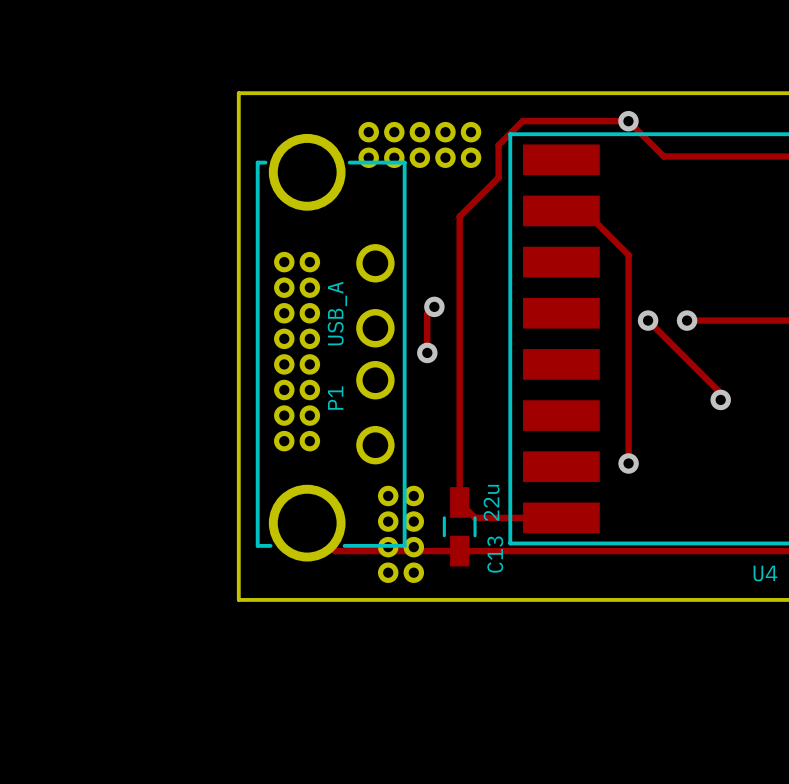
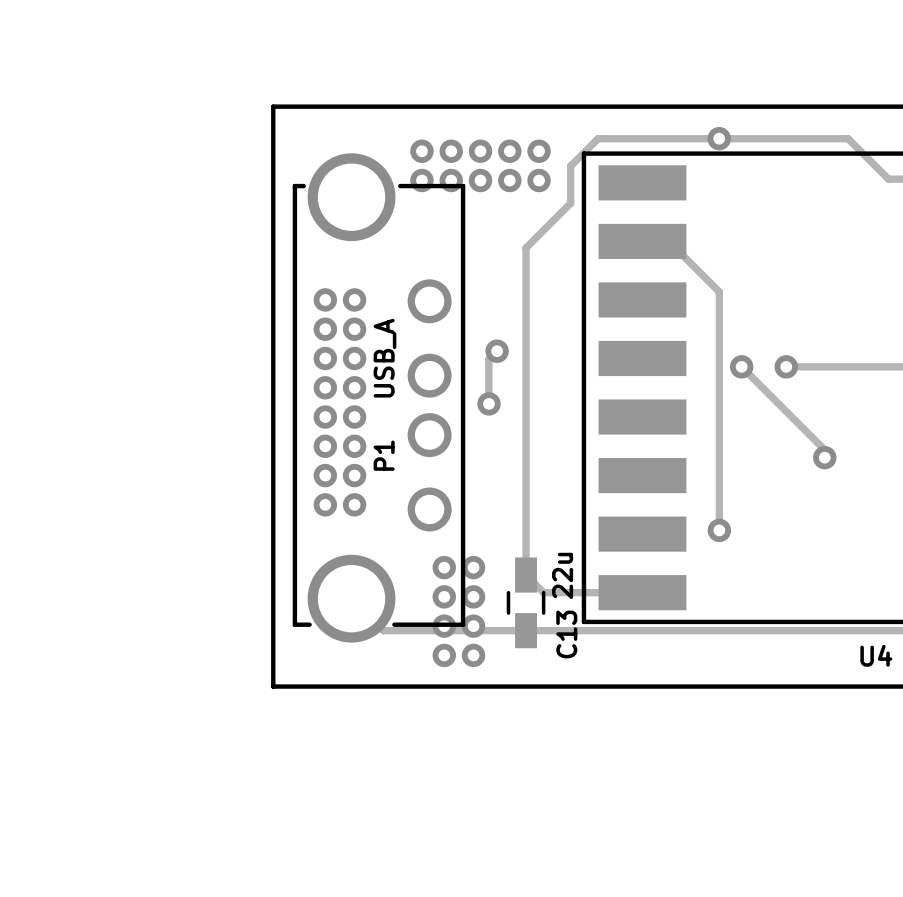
track: (628, 121) (663, 156) (776, 156) -> (719, 138) (848, 138) (888, 179)

